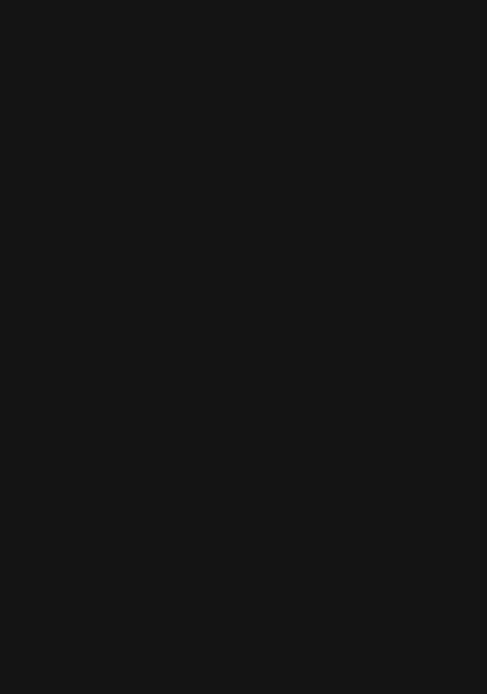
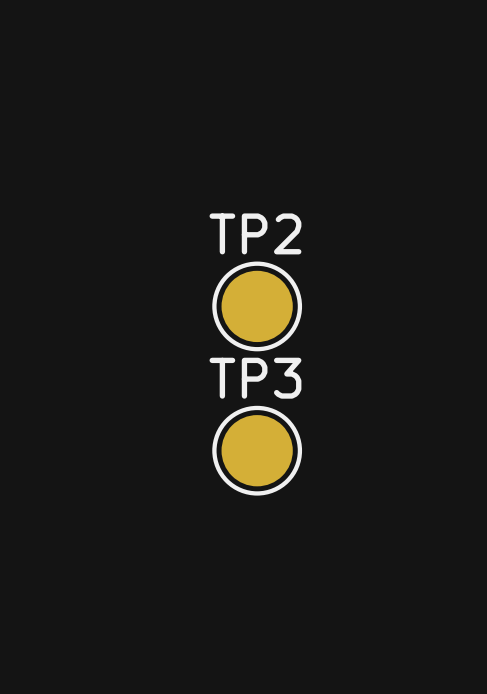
TP2: none -> (257, 306)
TP3: none -> (257, 450)

